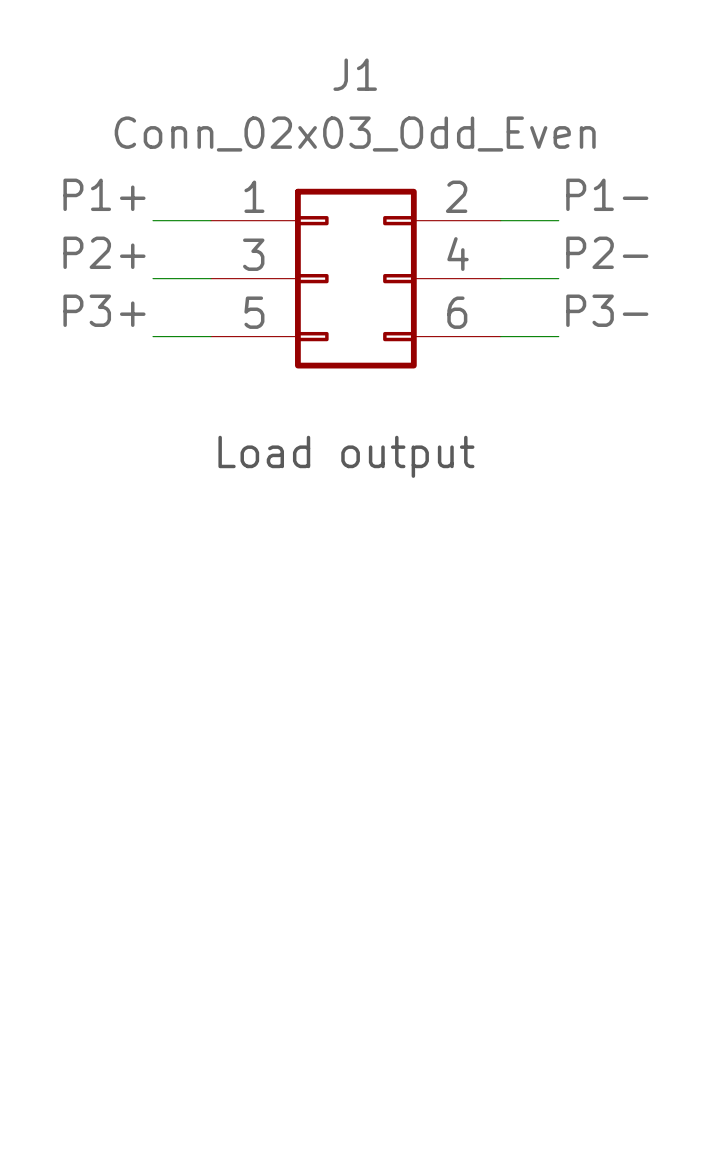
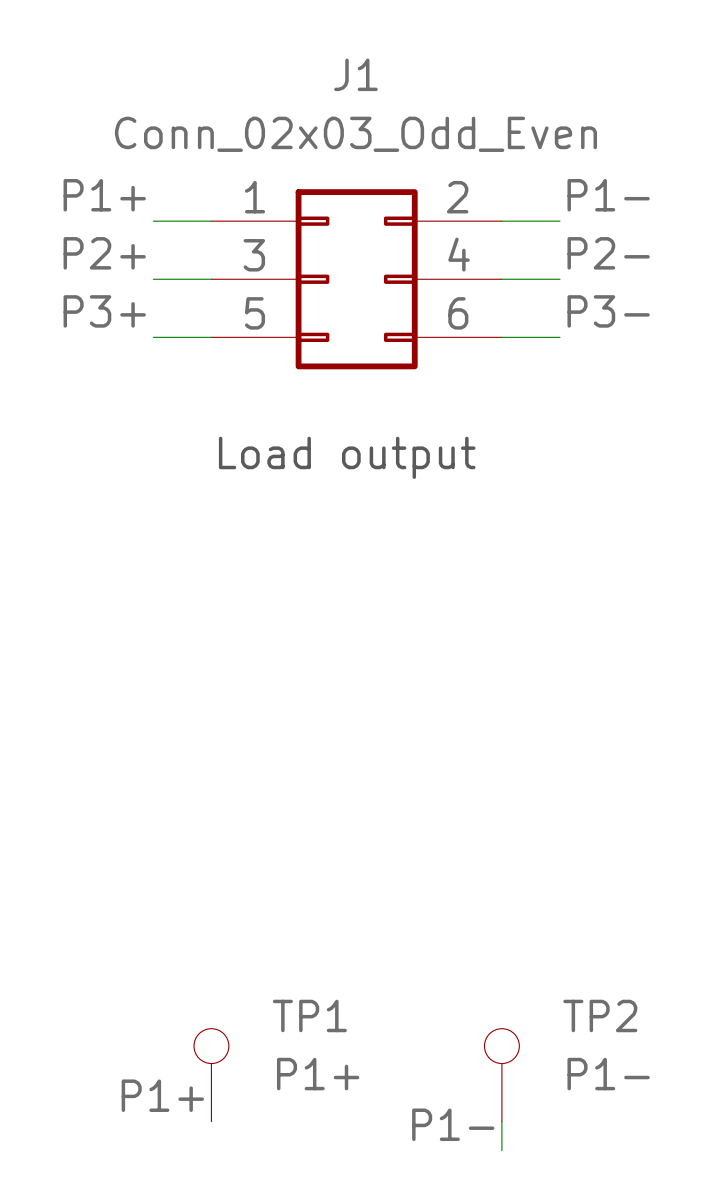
TP1: none -> P1+ (211, 1075)
TP2: none -> P1- (501, 1075)
label: none -> P1+ (162, 1095)
wire: none -> (501, 1121) (501, 1150)
label: none -> P1- (453, 1124)

